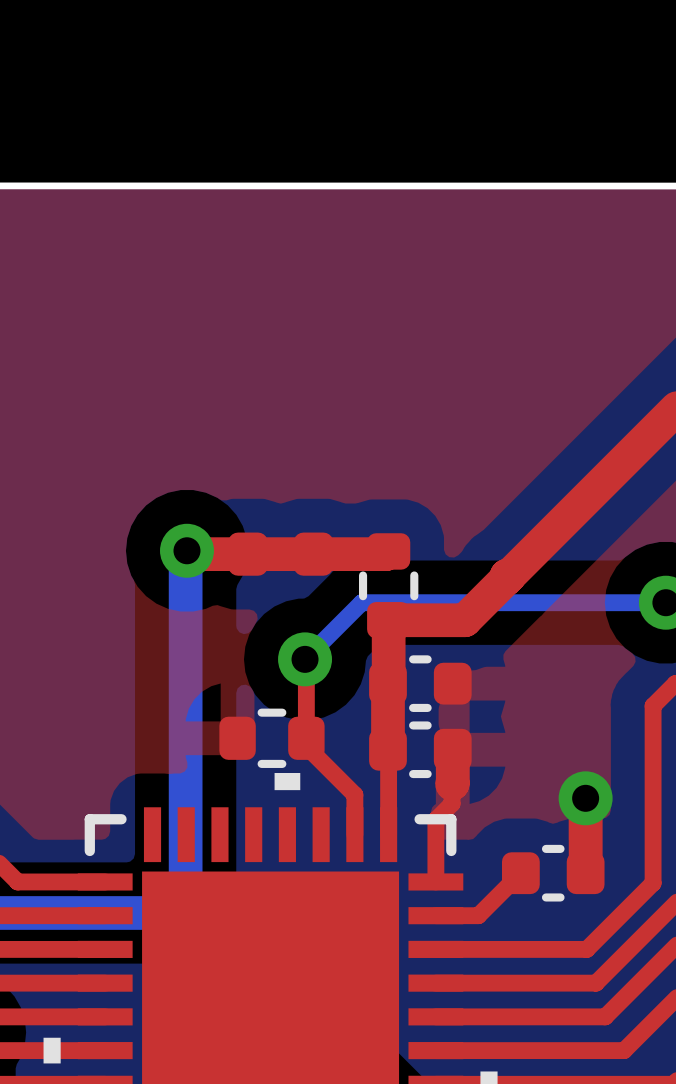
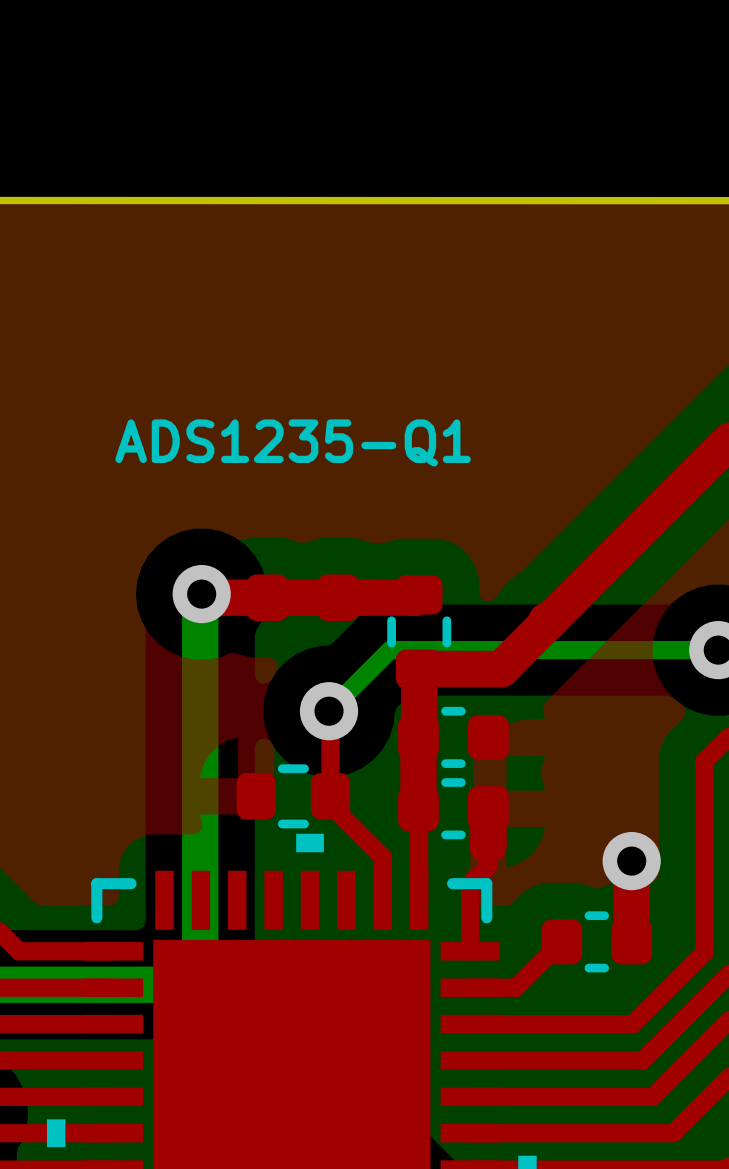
text: none -> ADS1235-Q1 (293, 442)

